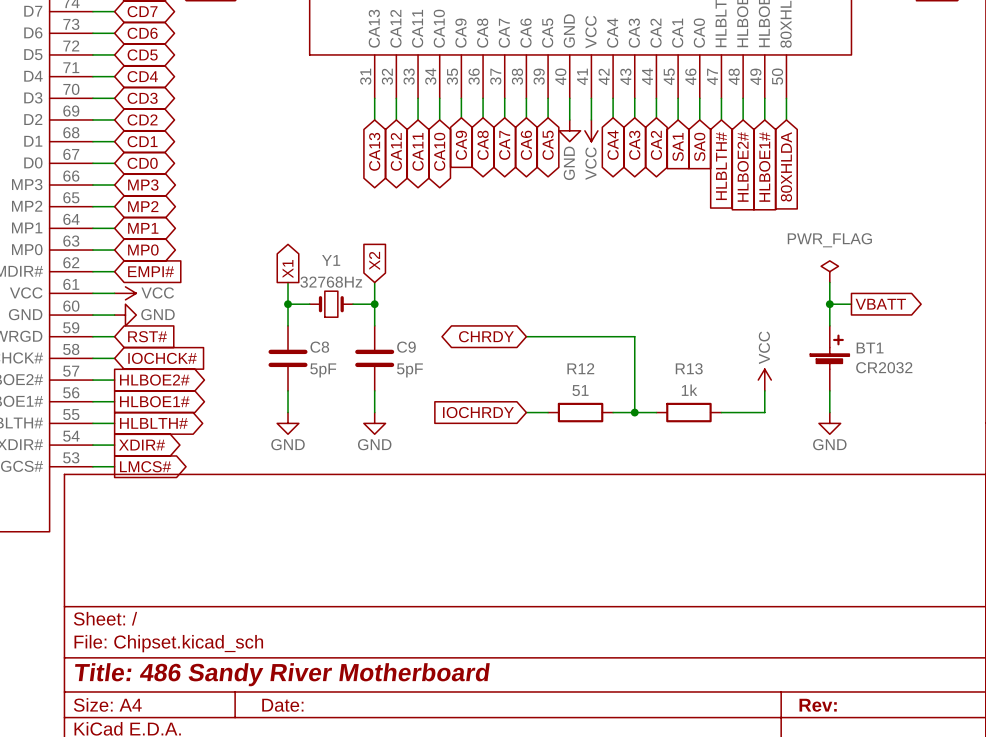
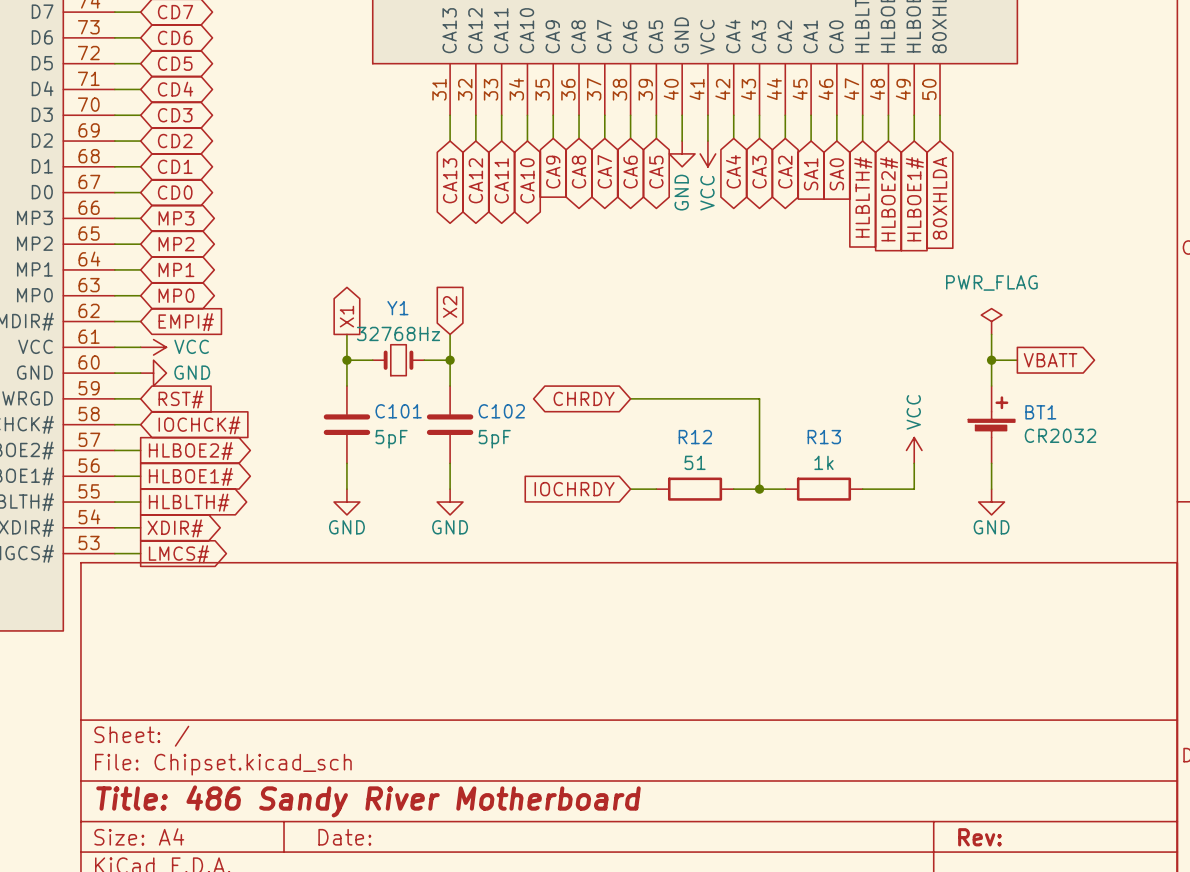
C8 name: C8 (319, 347) -> C101 (398, 411)
C9 name: C9 (406, 347) -> C102 (501, 411)

